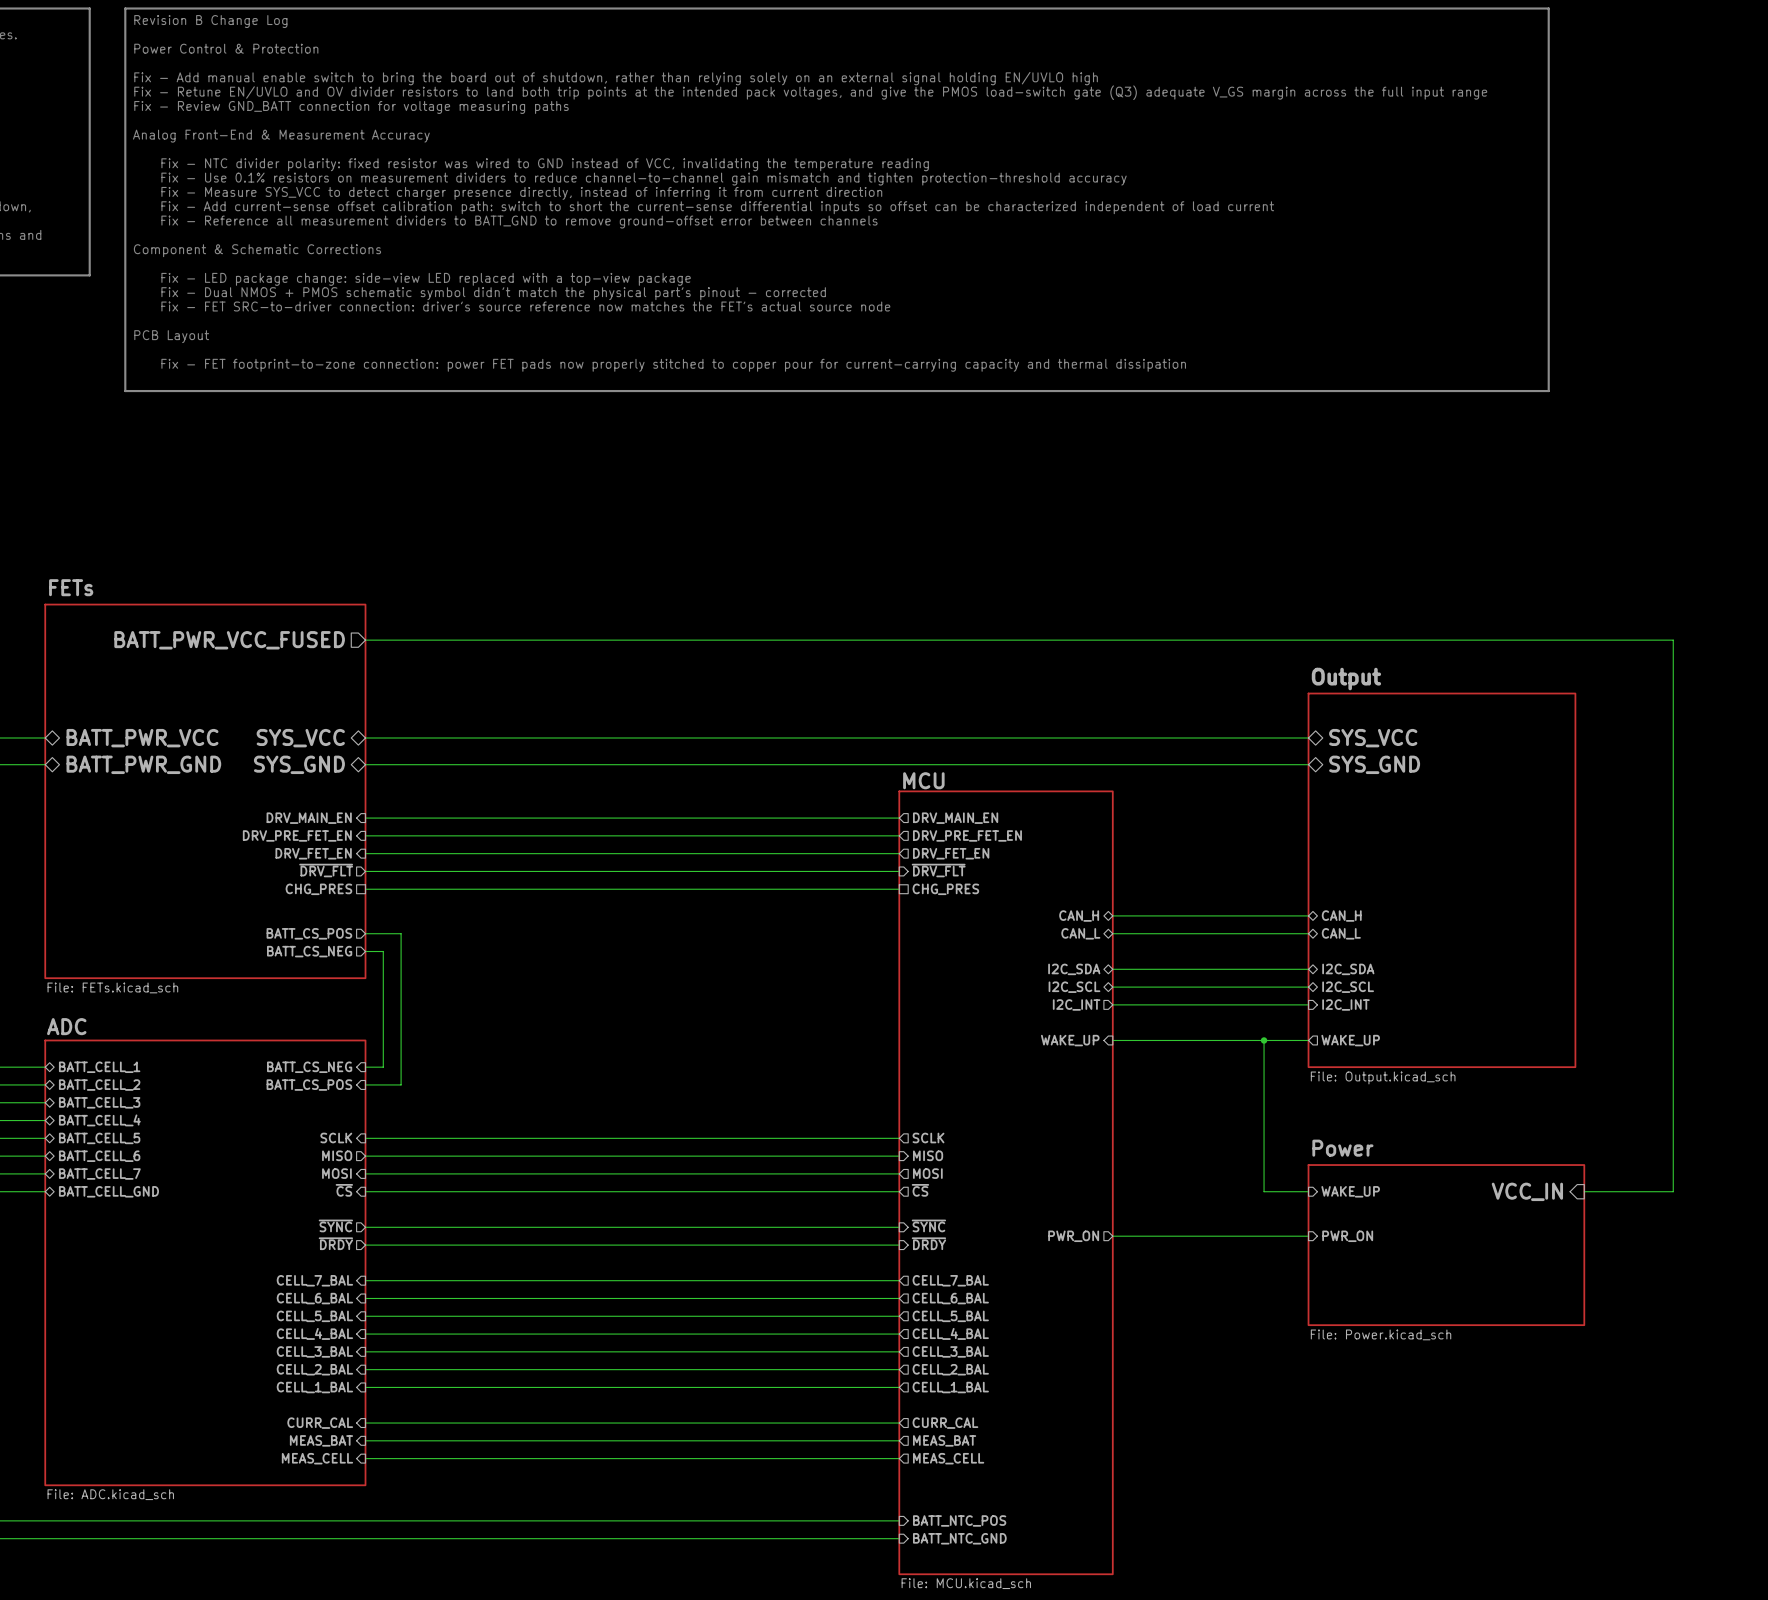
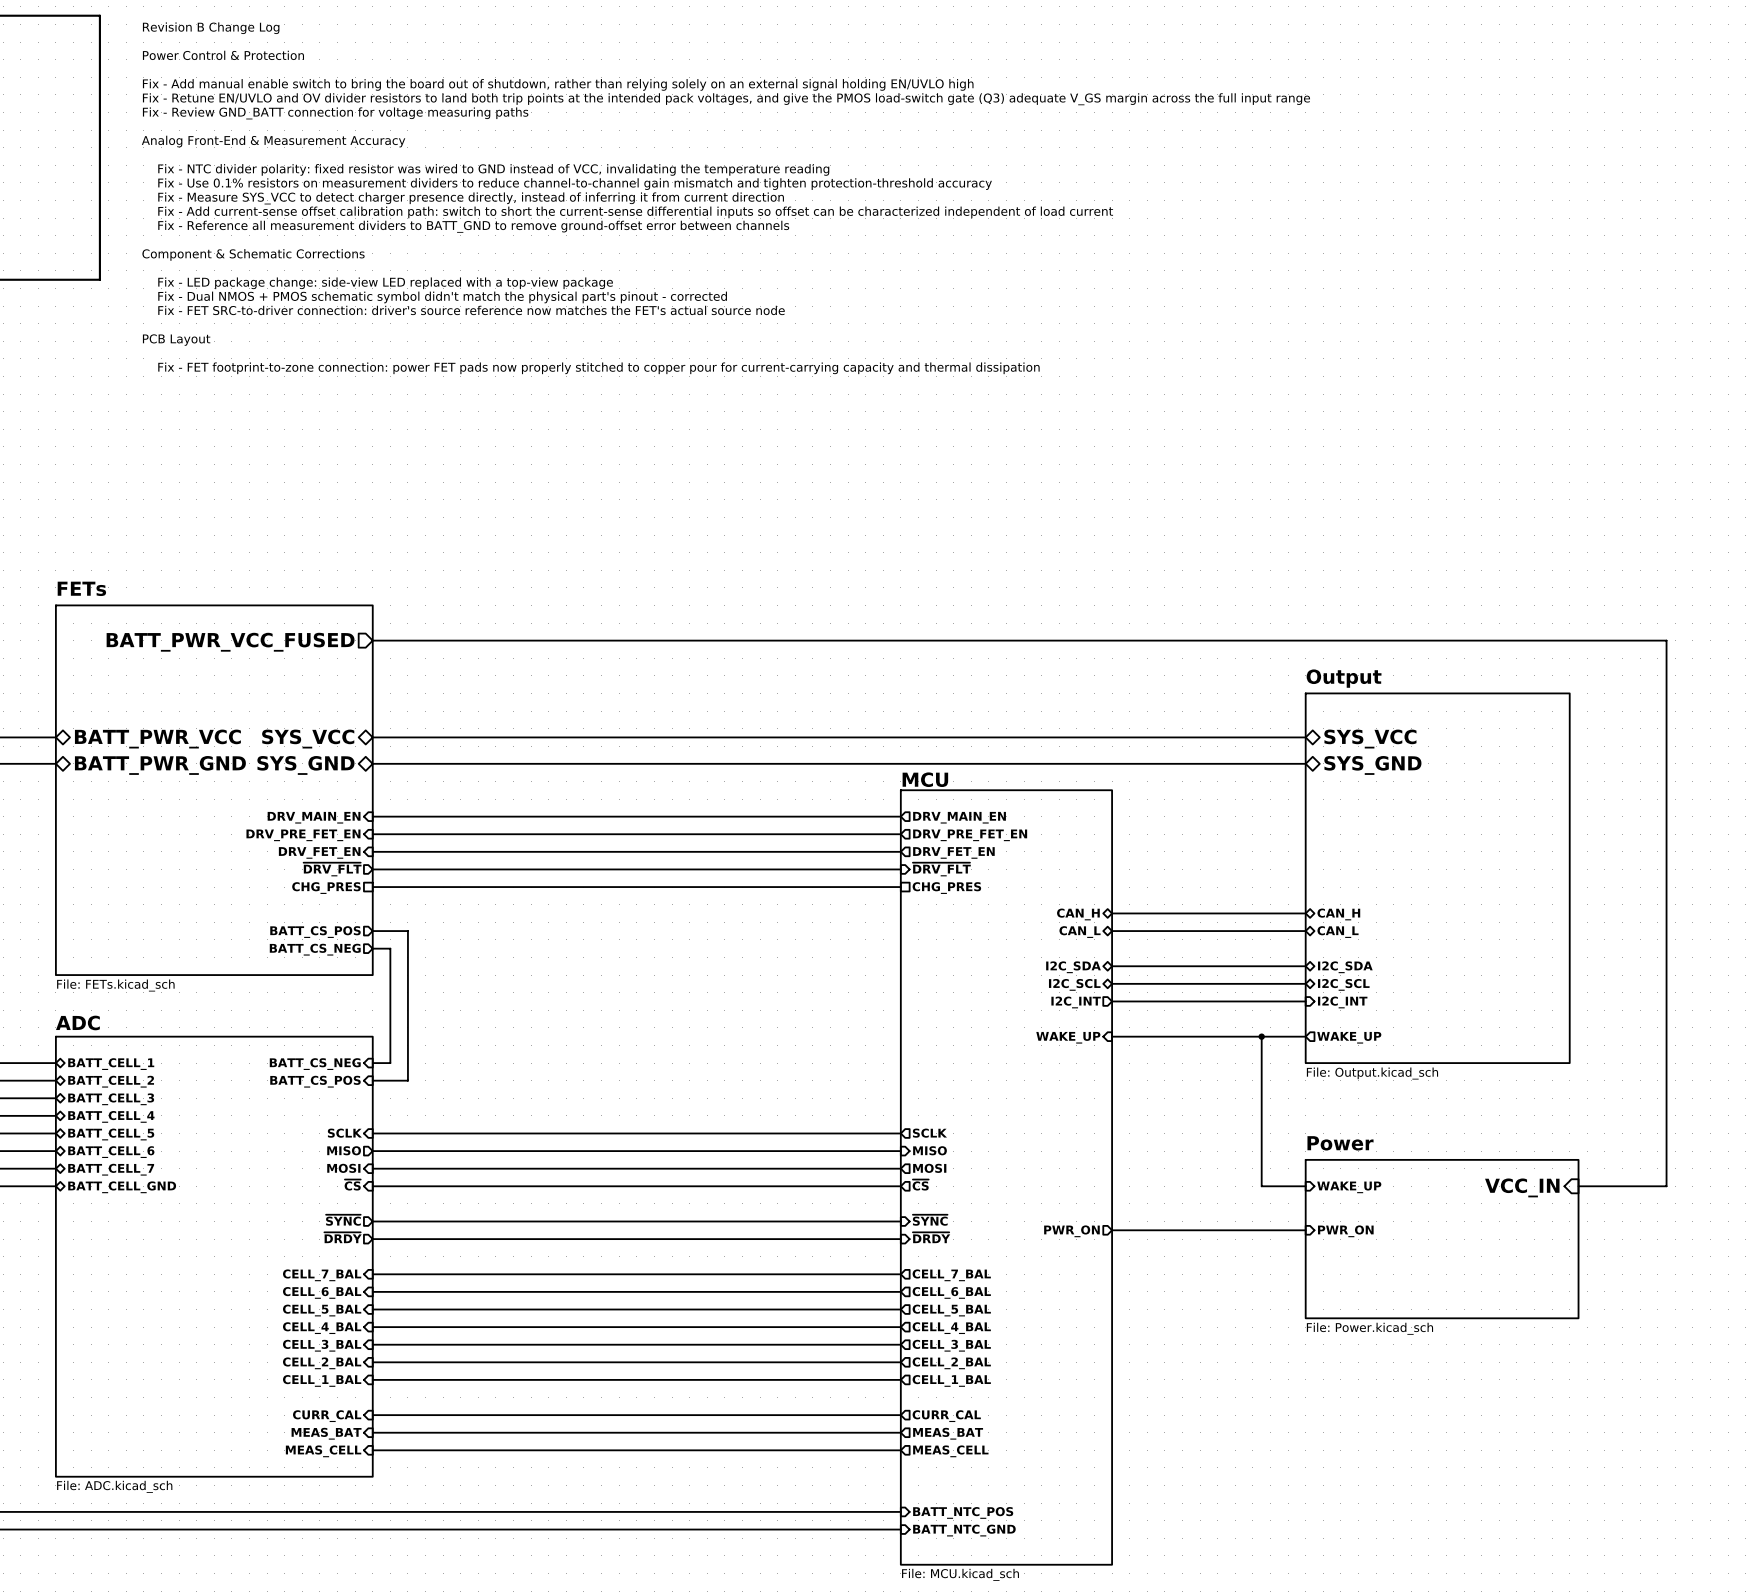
line: (125, 8) (1548, 8) (1548, 391) (125, 391) (125, 8) -> none

